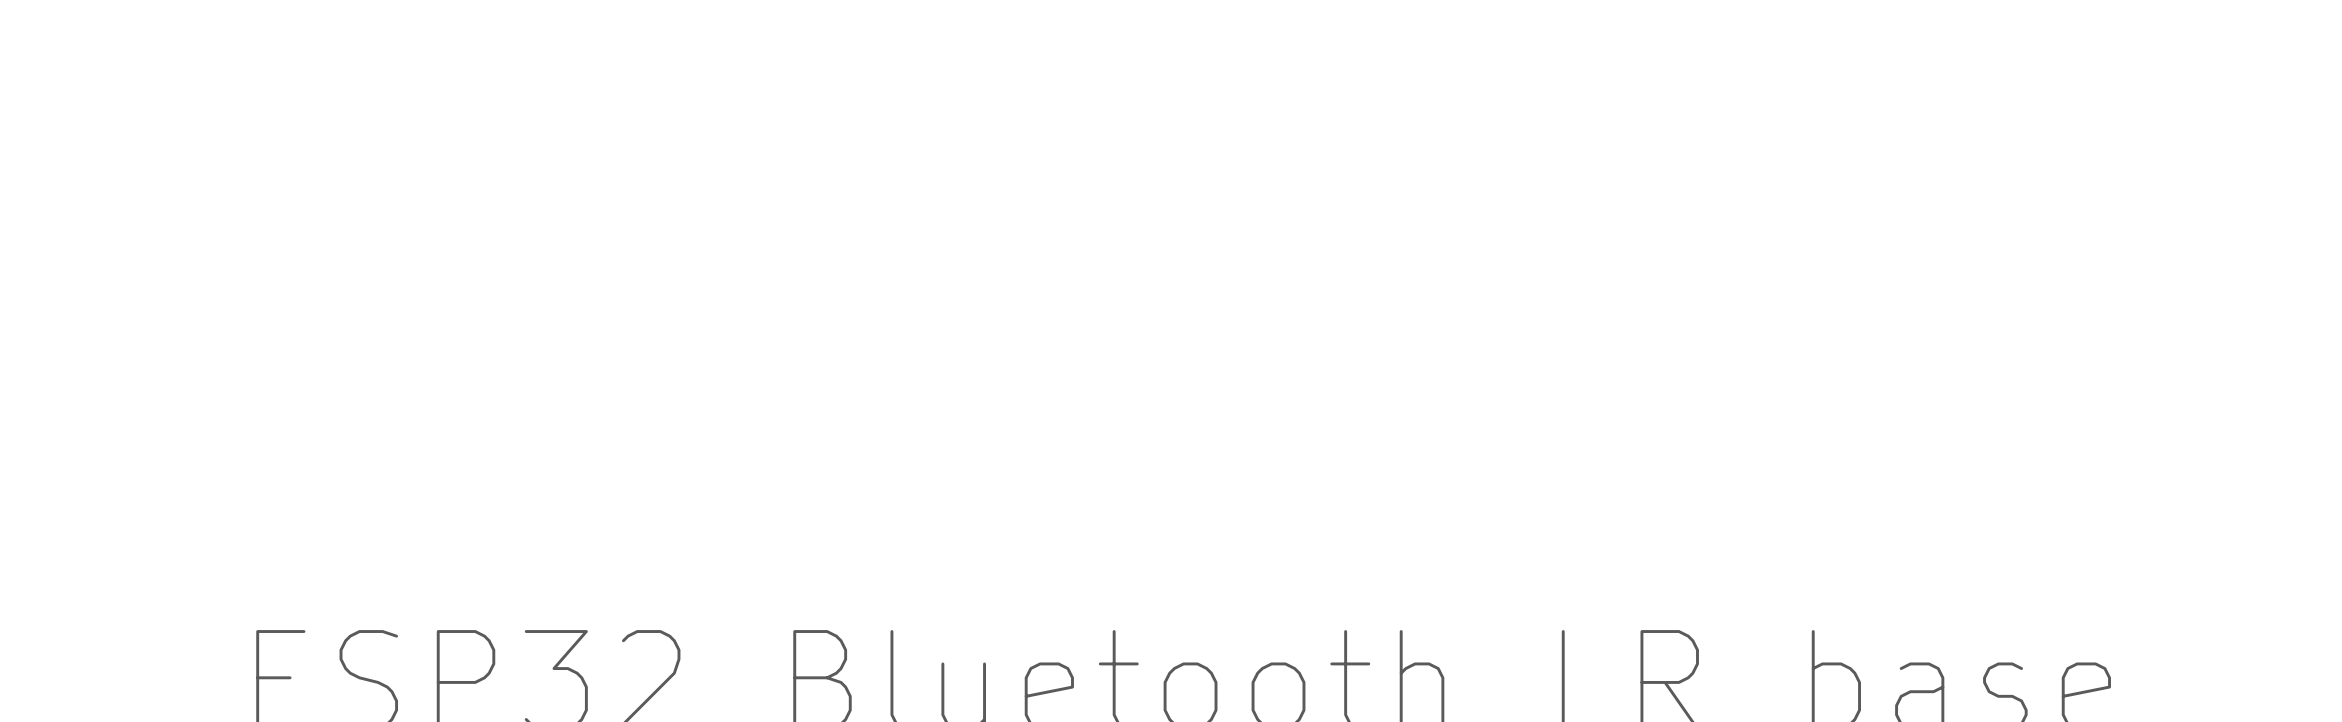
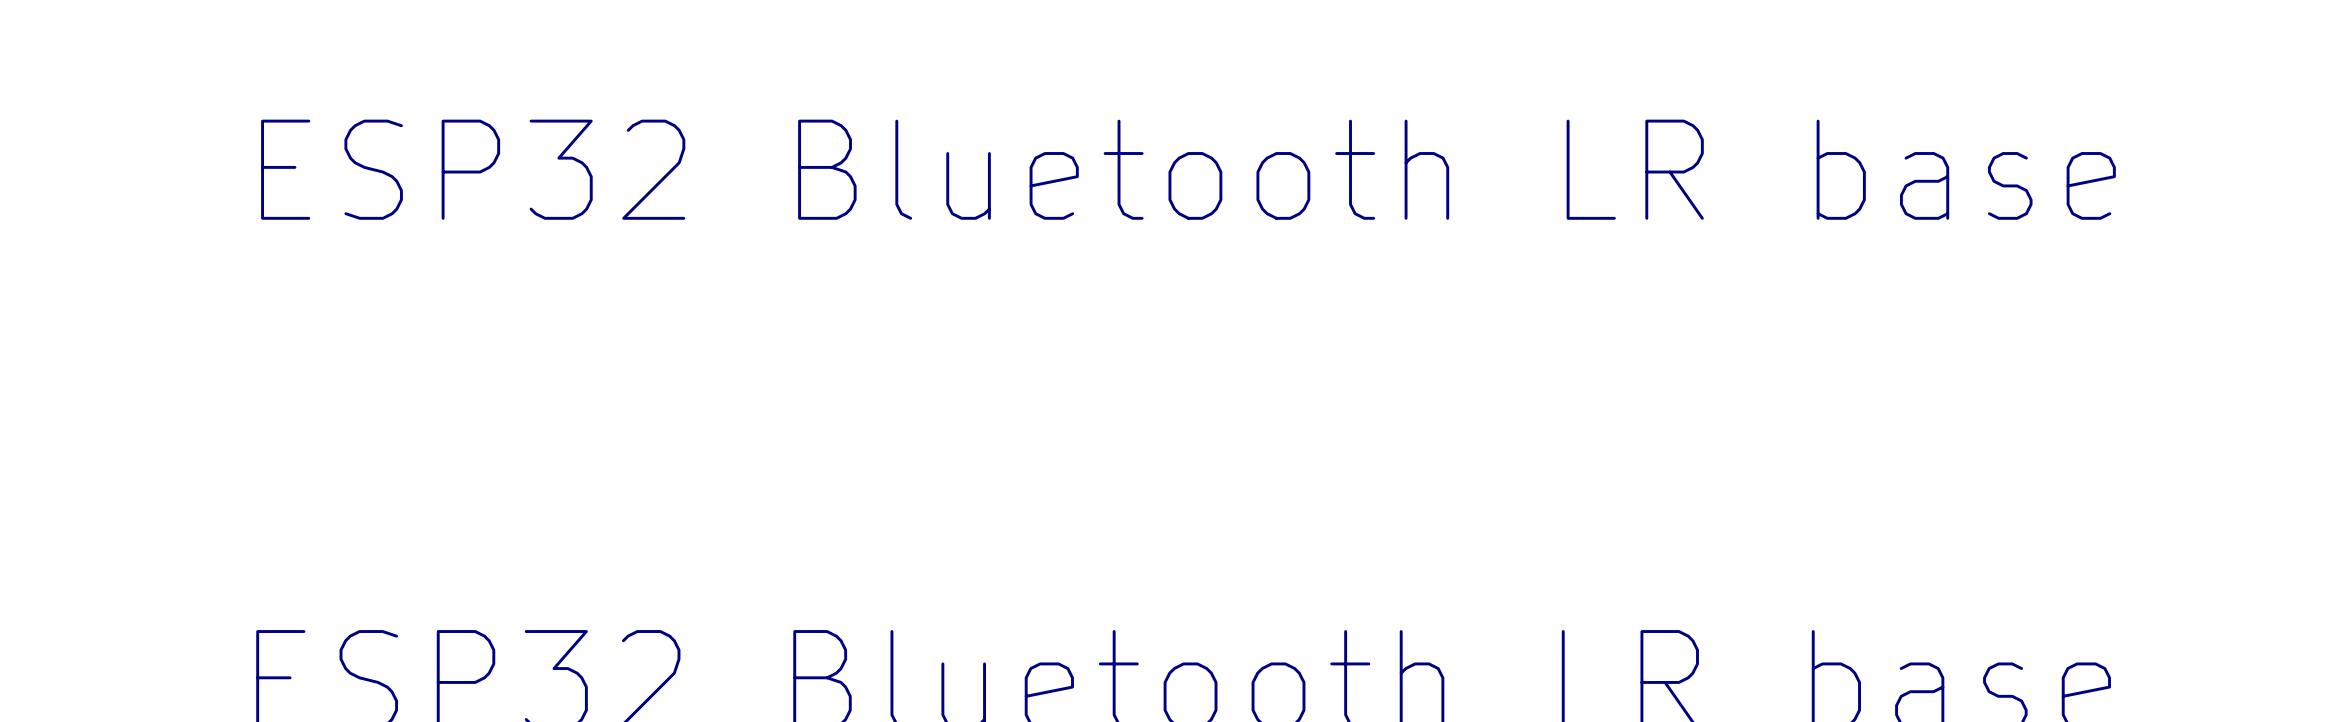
text: none -> ESP32 Bluetooth LR base (1188, 169)

